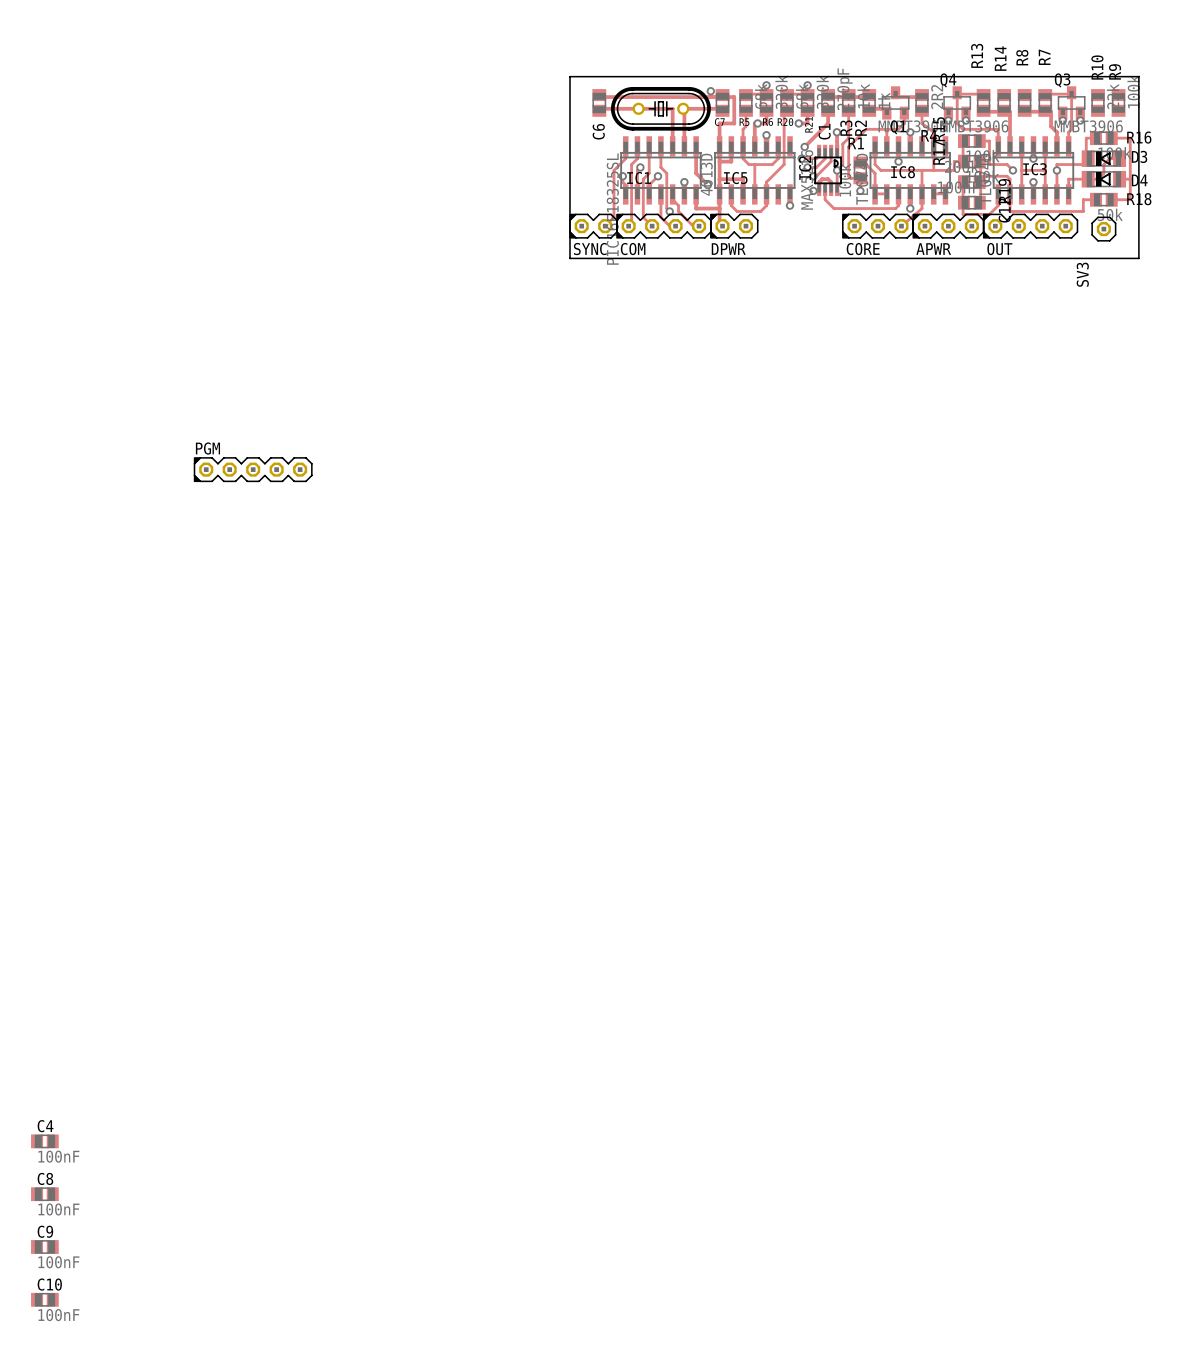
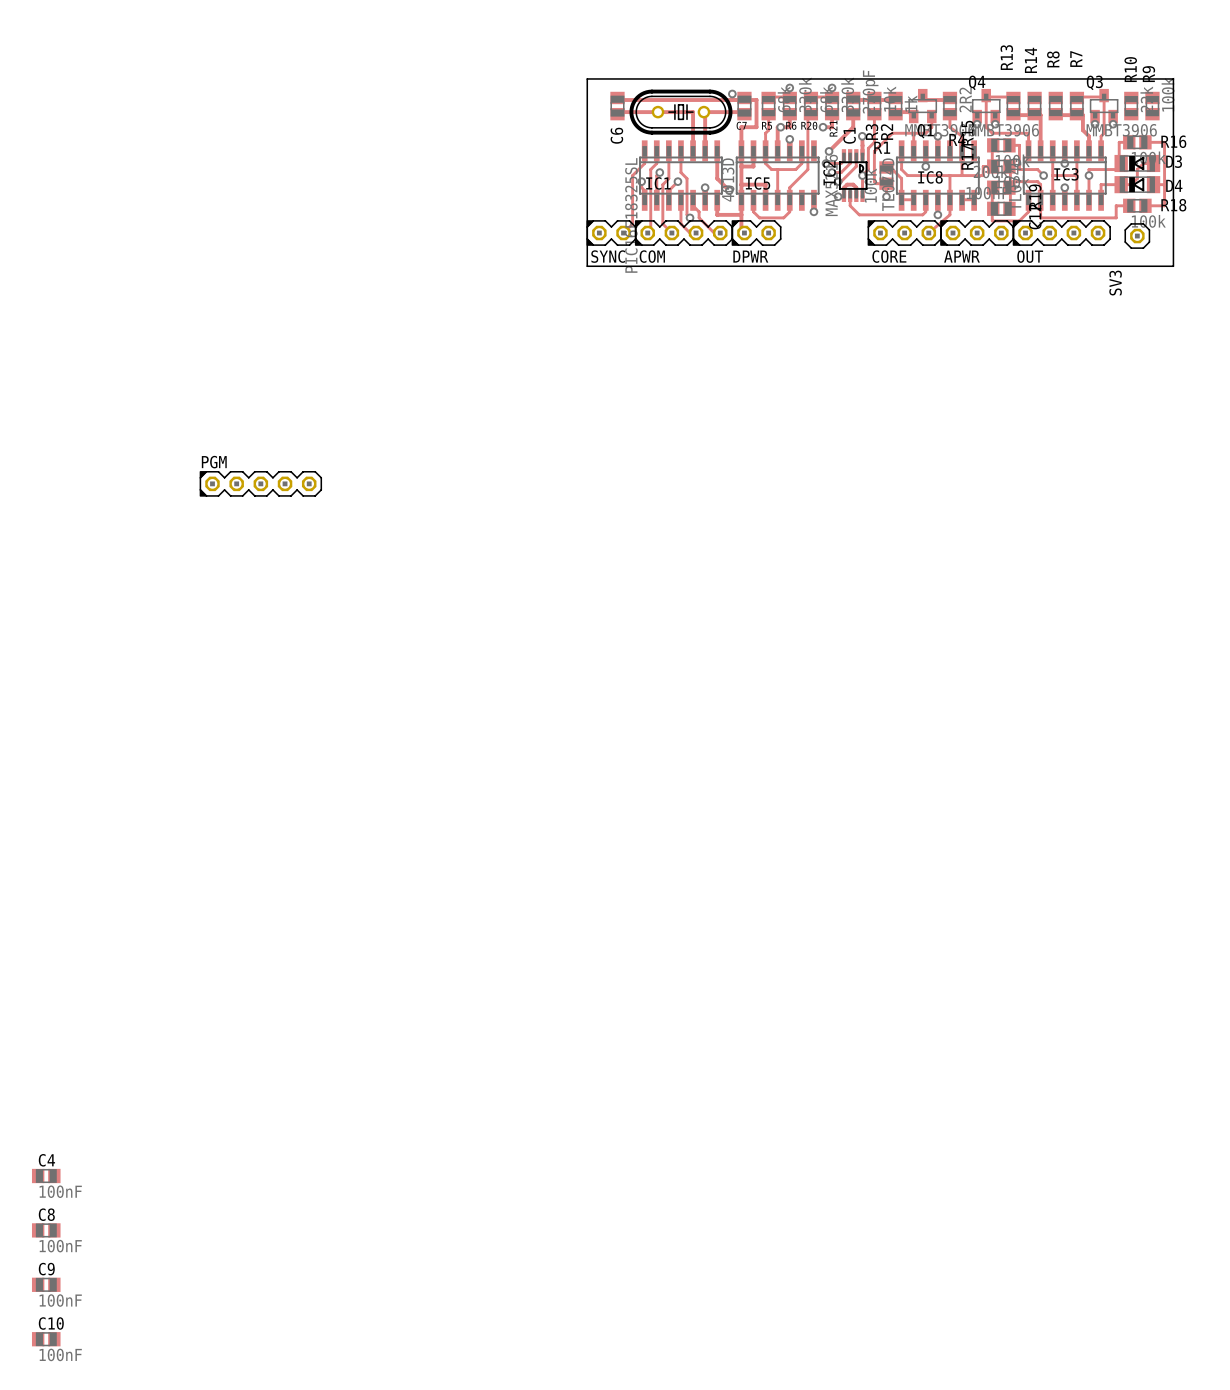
R18 value: 50k (1110, 214) -> 100k (1148, 221)

